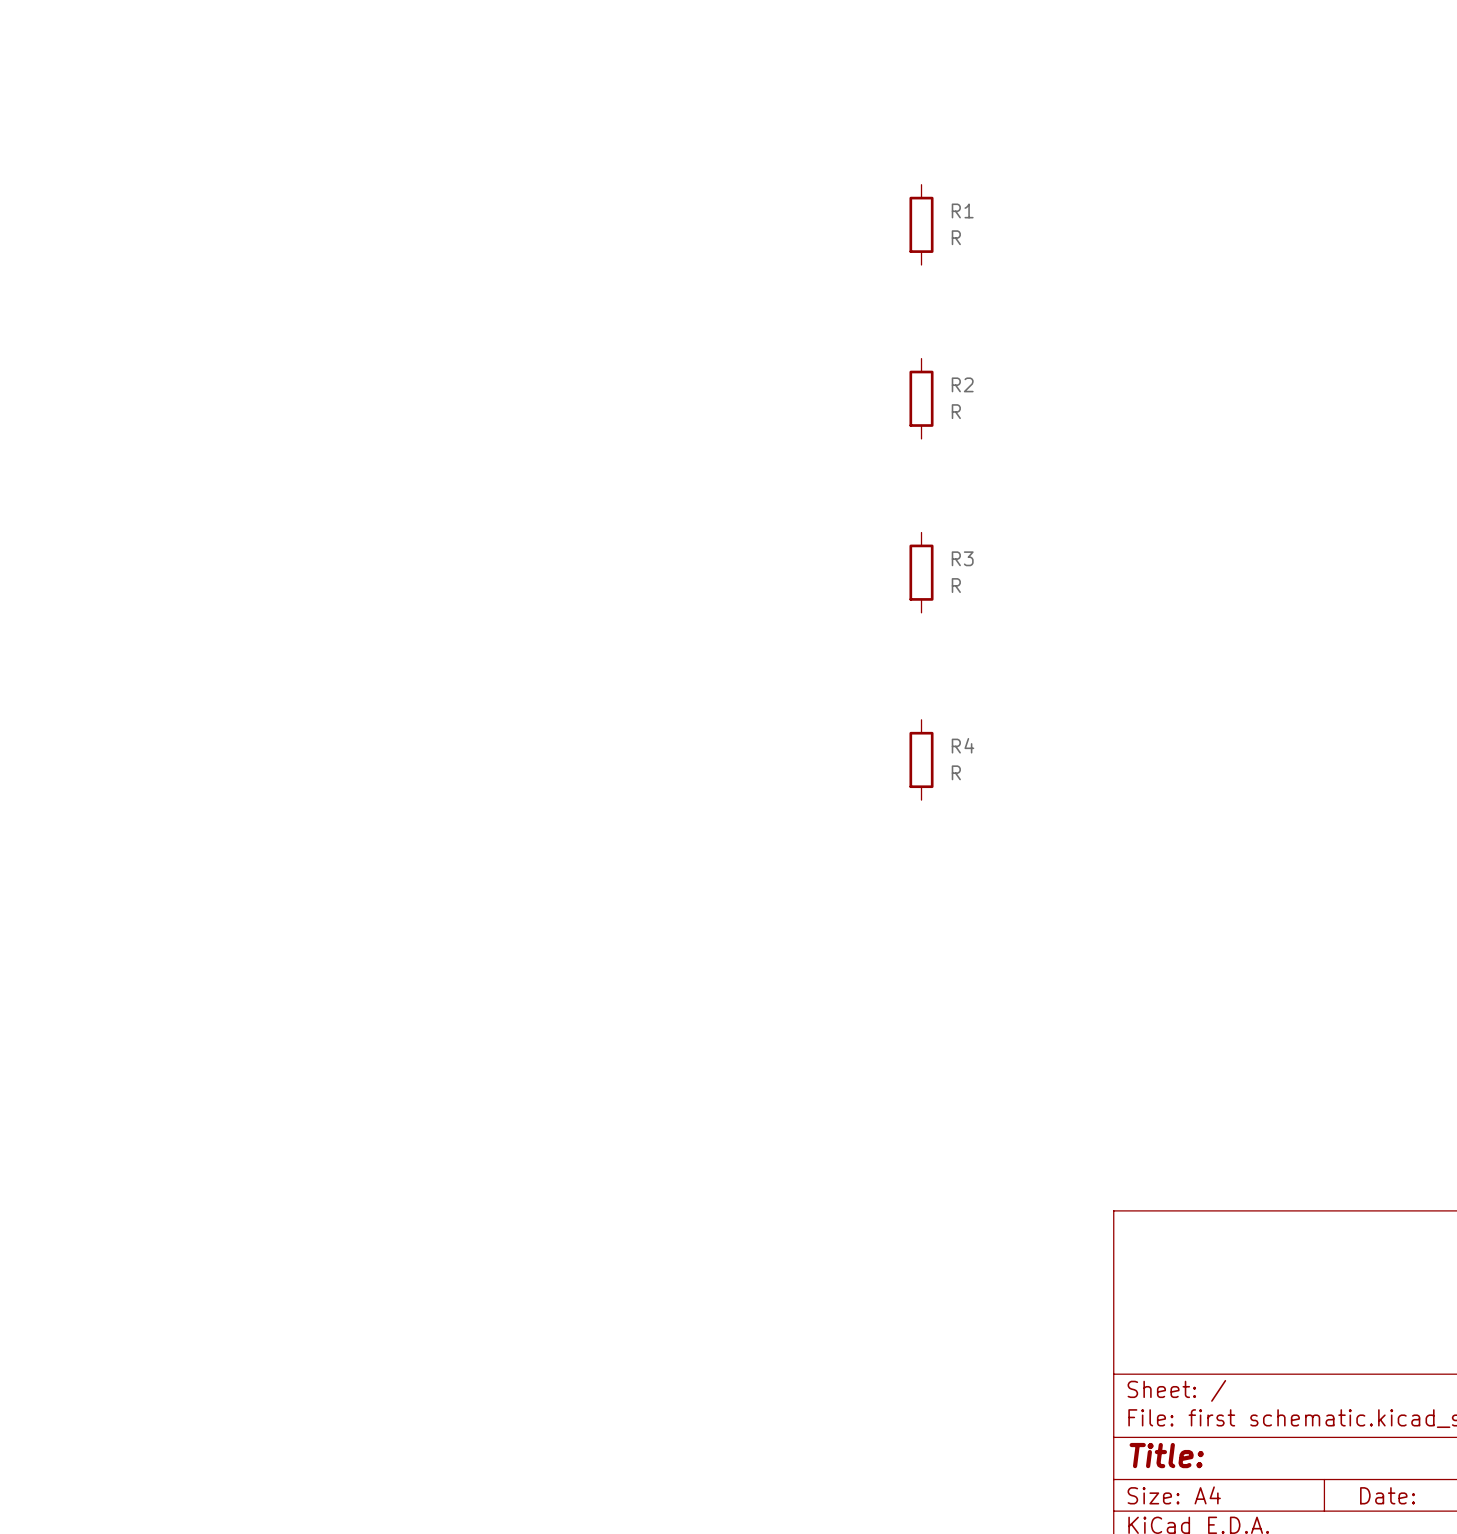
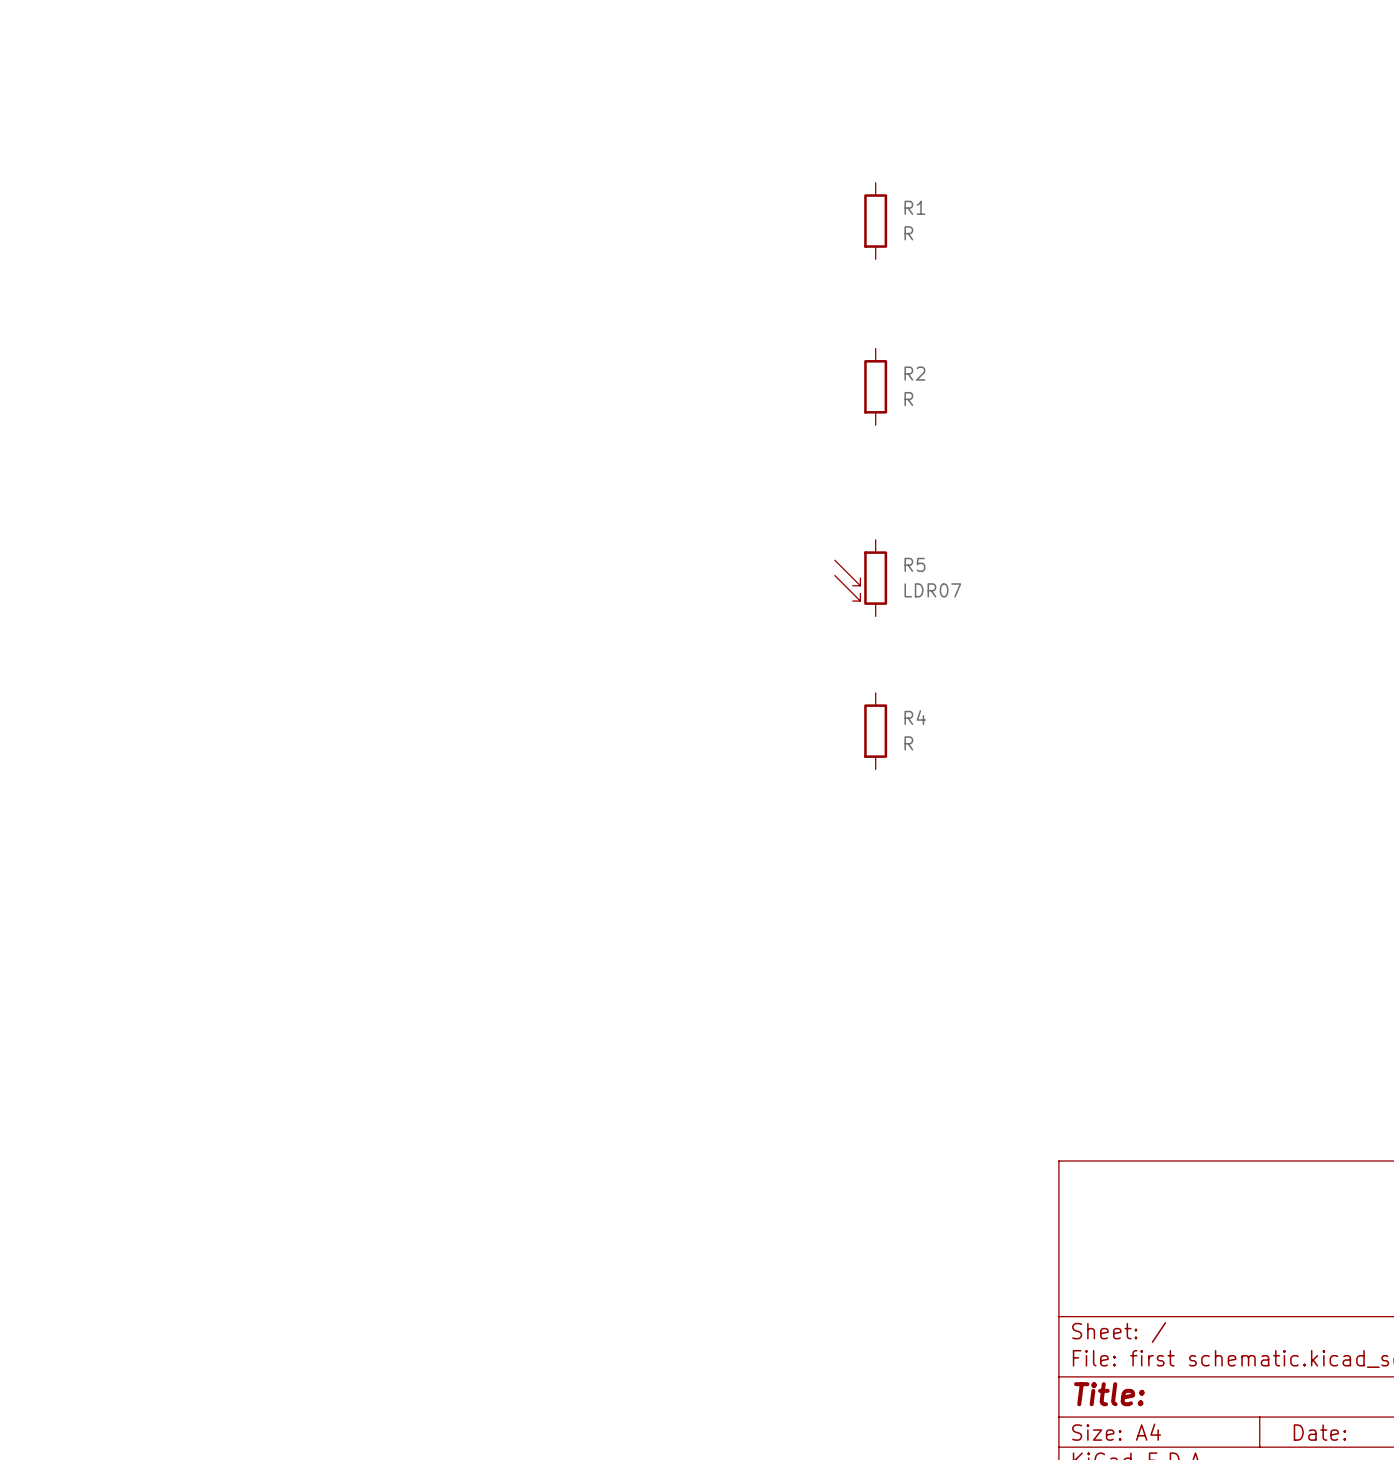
R3: R (921, 572) -> none
R5: none -> LDR07 (861, 578)

